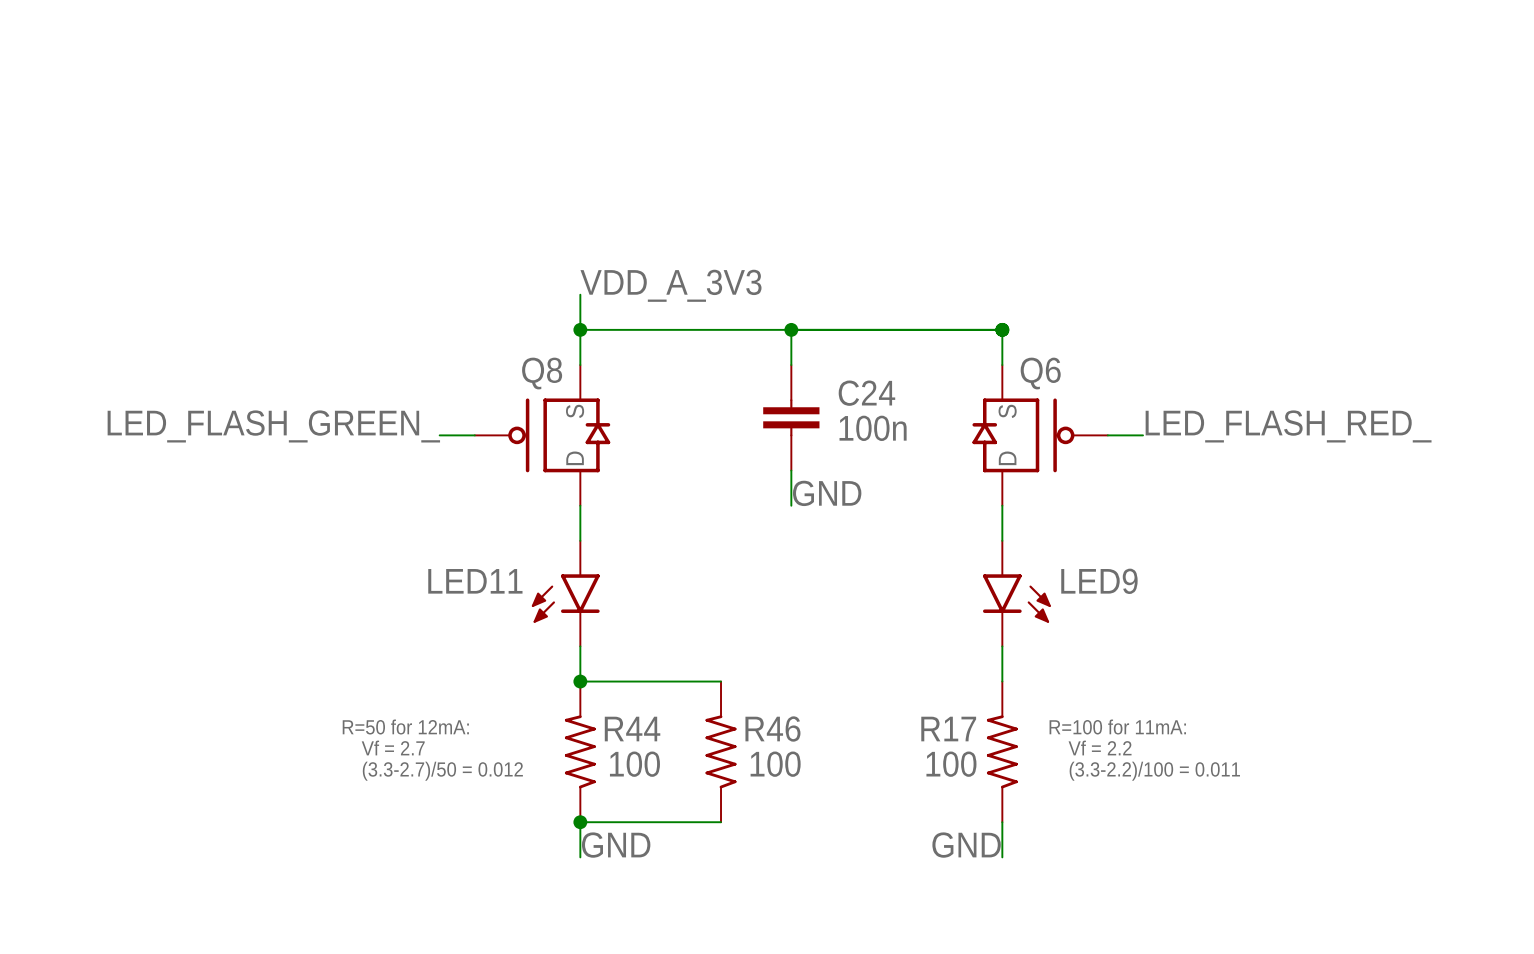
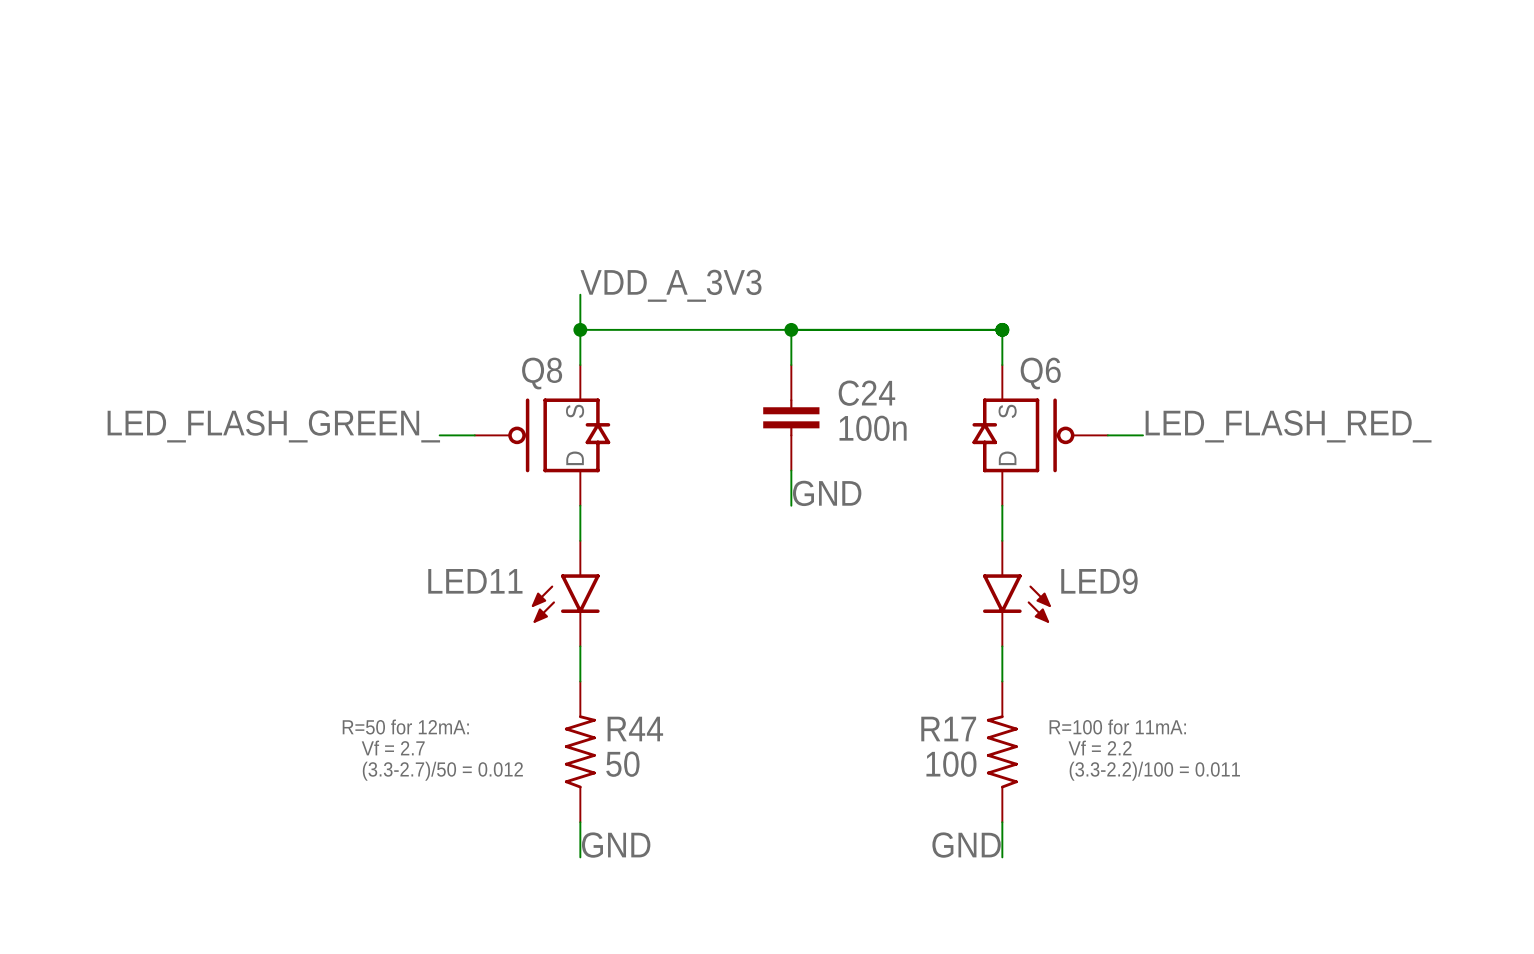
wire: (580, 681) (721, 681) -> none
junction: (580, 681) -> none
R44 flip: as is (580, 751) -> left-right (580, 751)
R46: 100 (721, 751) -> none
R44 value: 100 (634, 764) -> 50 (622, 764)
wire: (580, 822) (721, 822) -> none
junction: (580, 822) -> none

